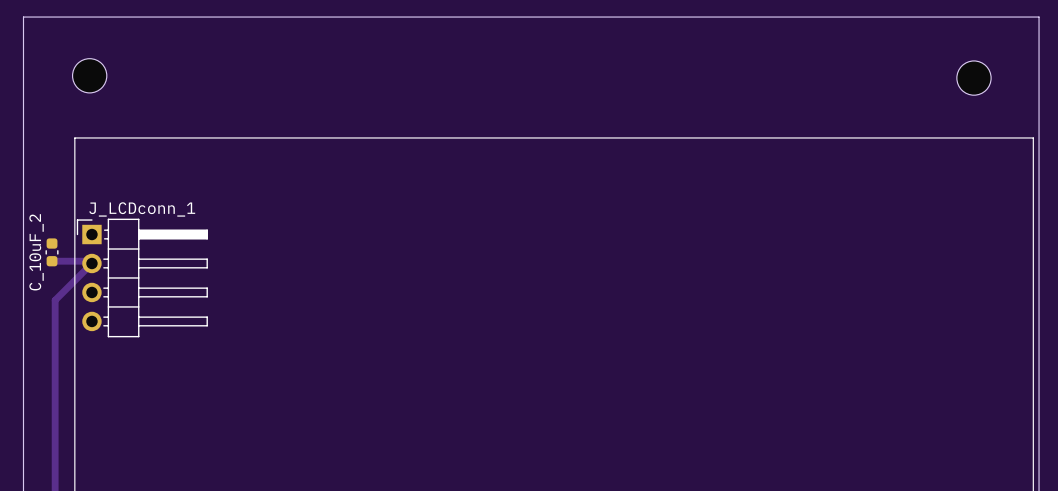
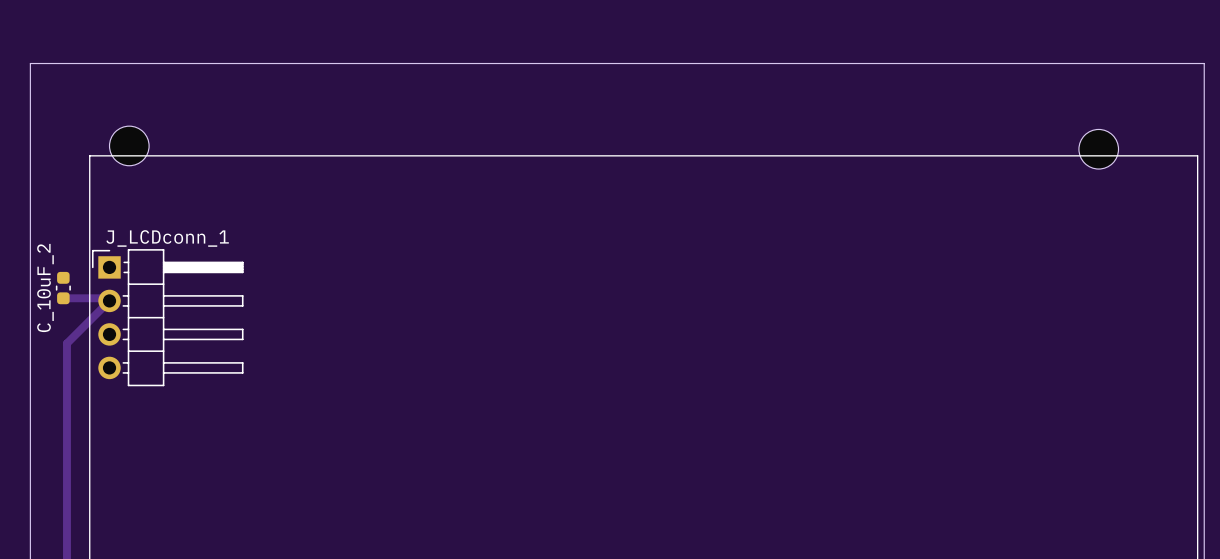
board edge: (23, 58) (23, 17) (1039, 17) (1039, 58) -> (30, 63) (1204, 63)
part position: (89, 75) -> (129, 145)
part position: (973, 78) -> (1098, 149)

